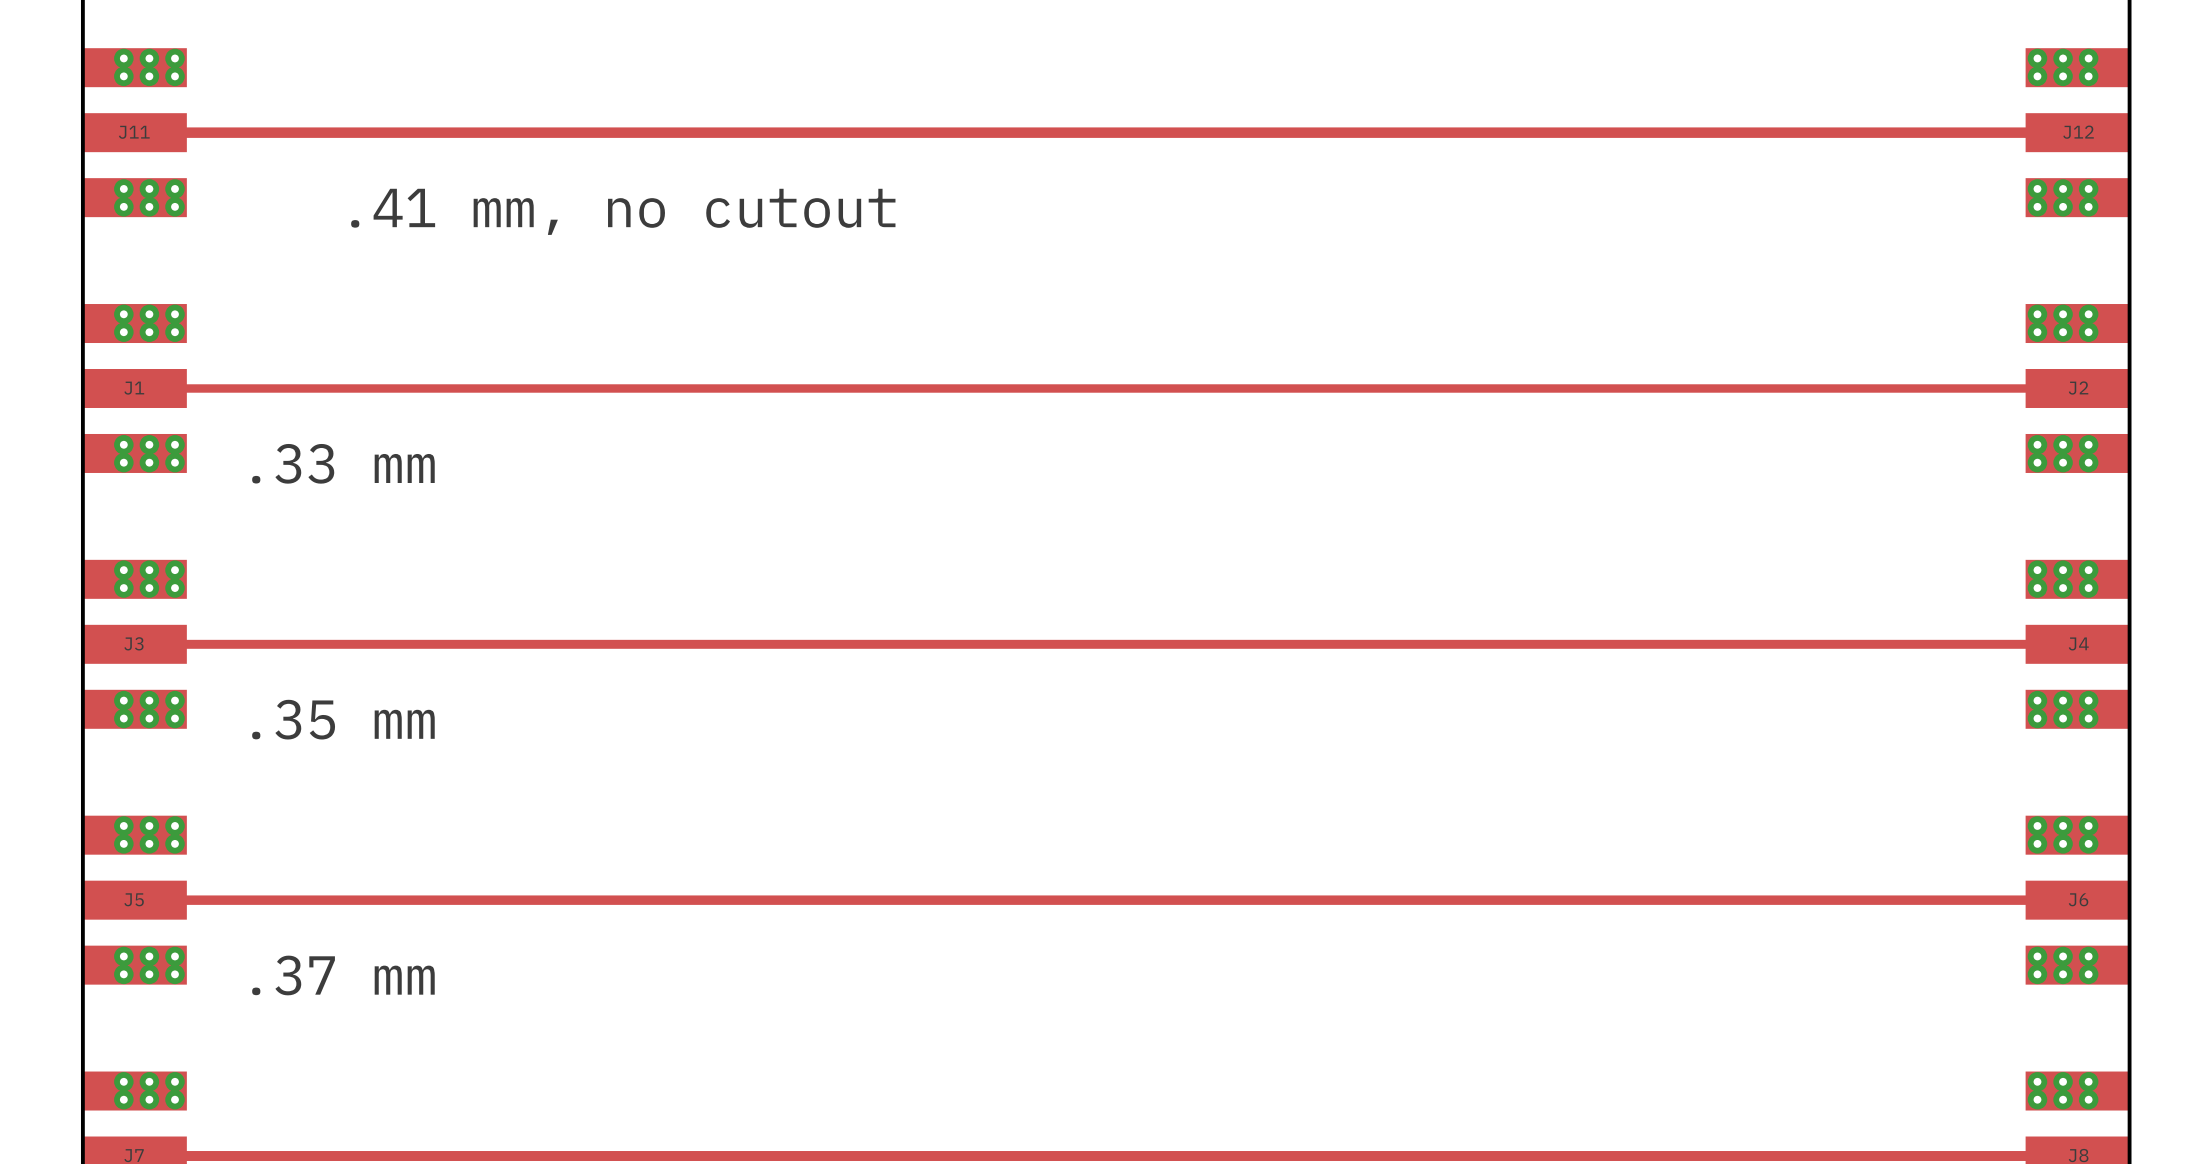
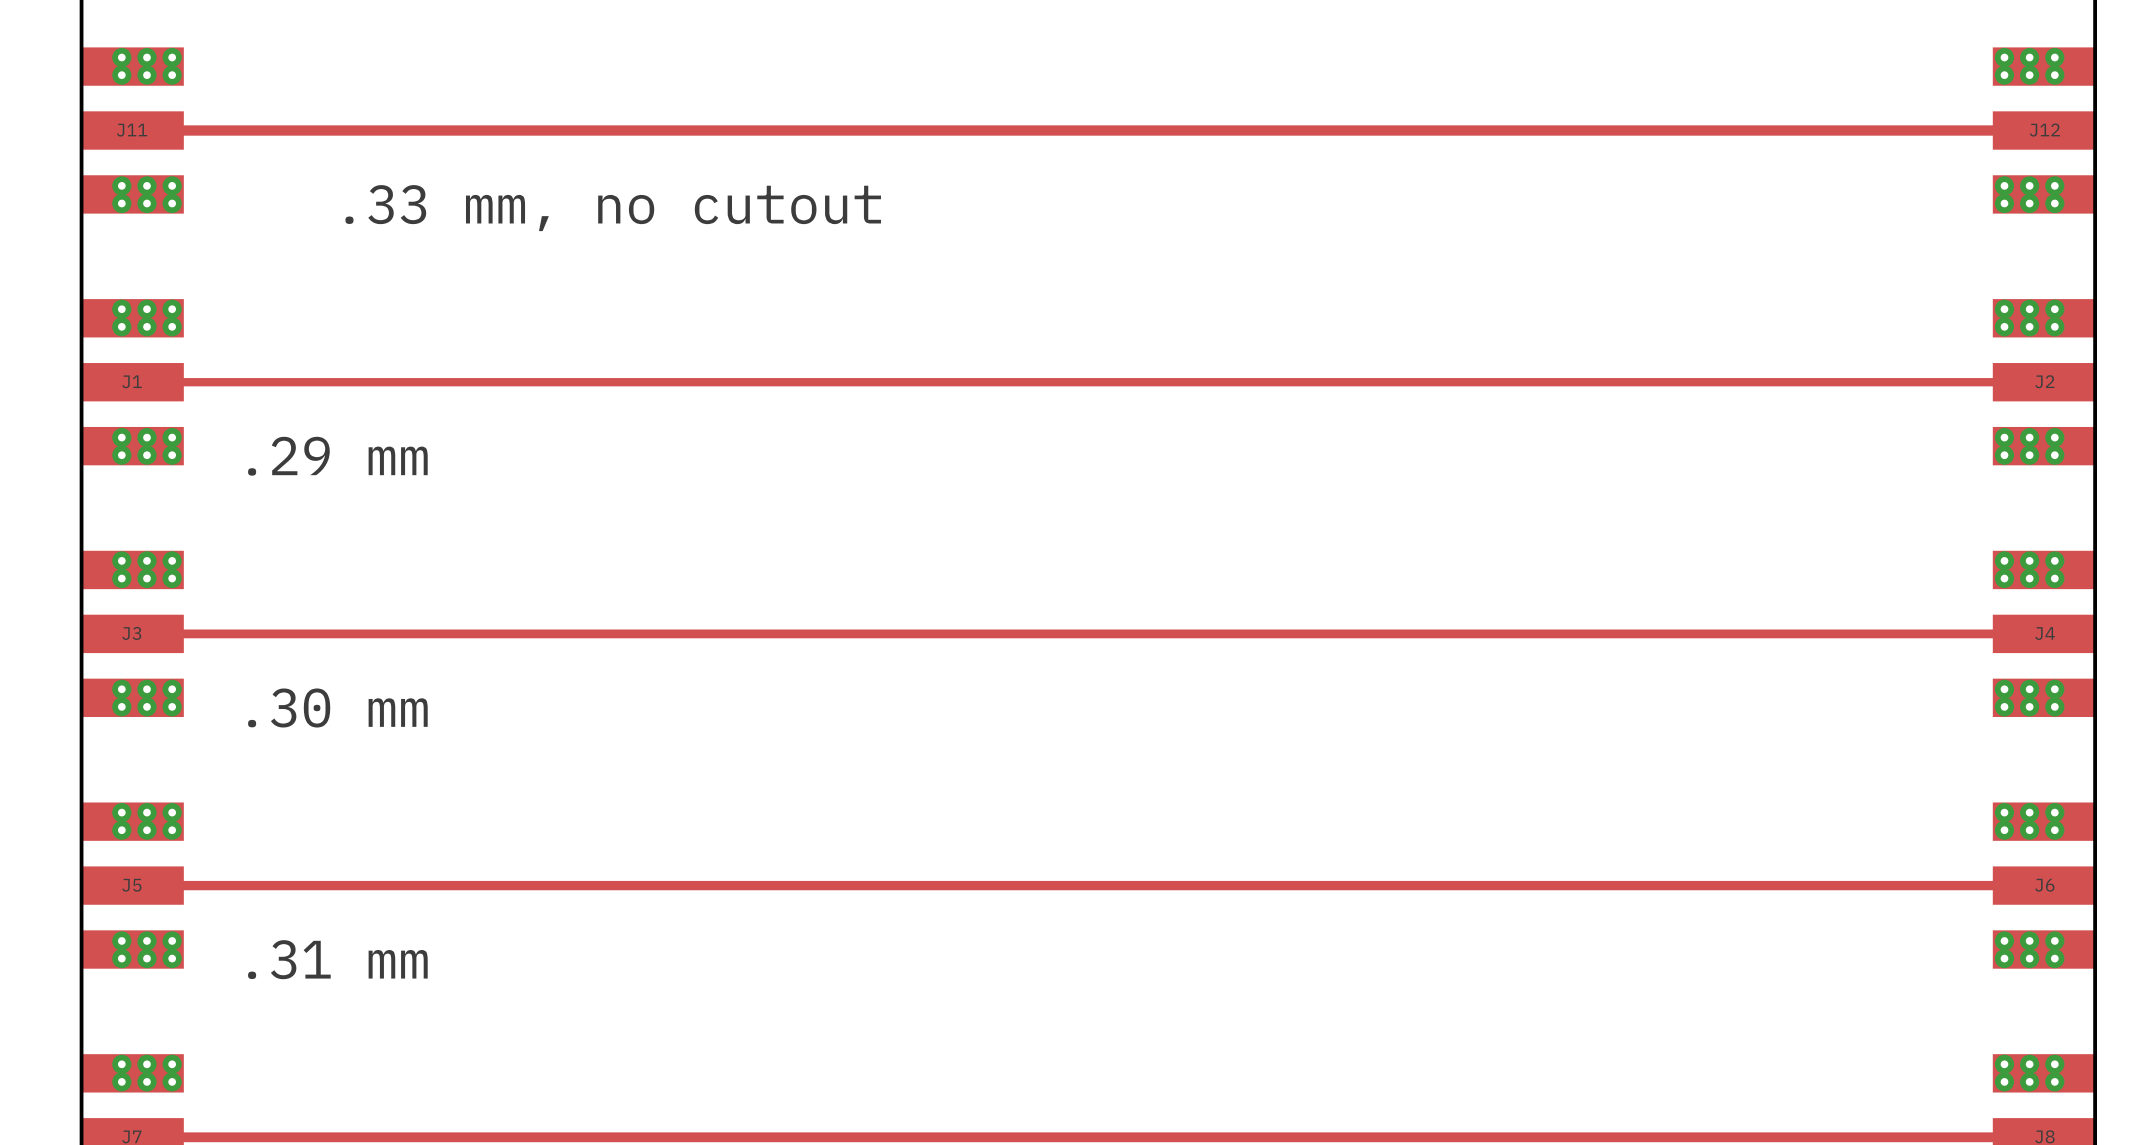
text: .41 mm, no cutout (623, 211) -> .33 mm, no cutout (613, 208)
text: .33 mm (343, 463) -> .29 mm (337, 456)
text: .35 mm (343, 719) -> .30 mm (337, 707)
text: .37 mm (343, 975) -> .31 mm (337, 959)

